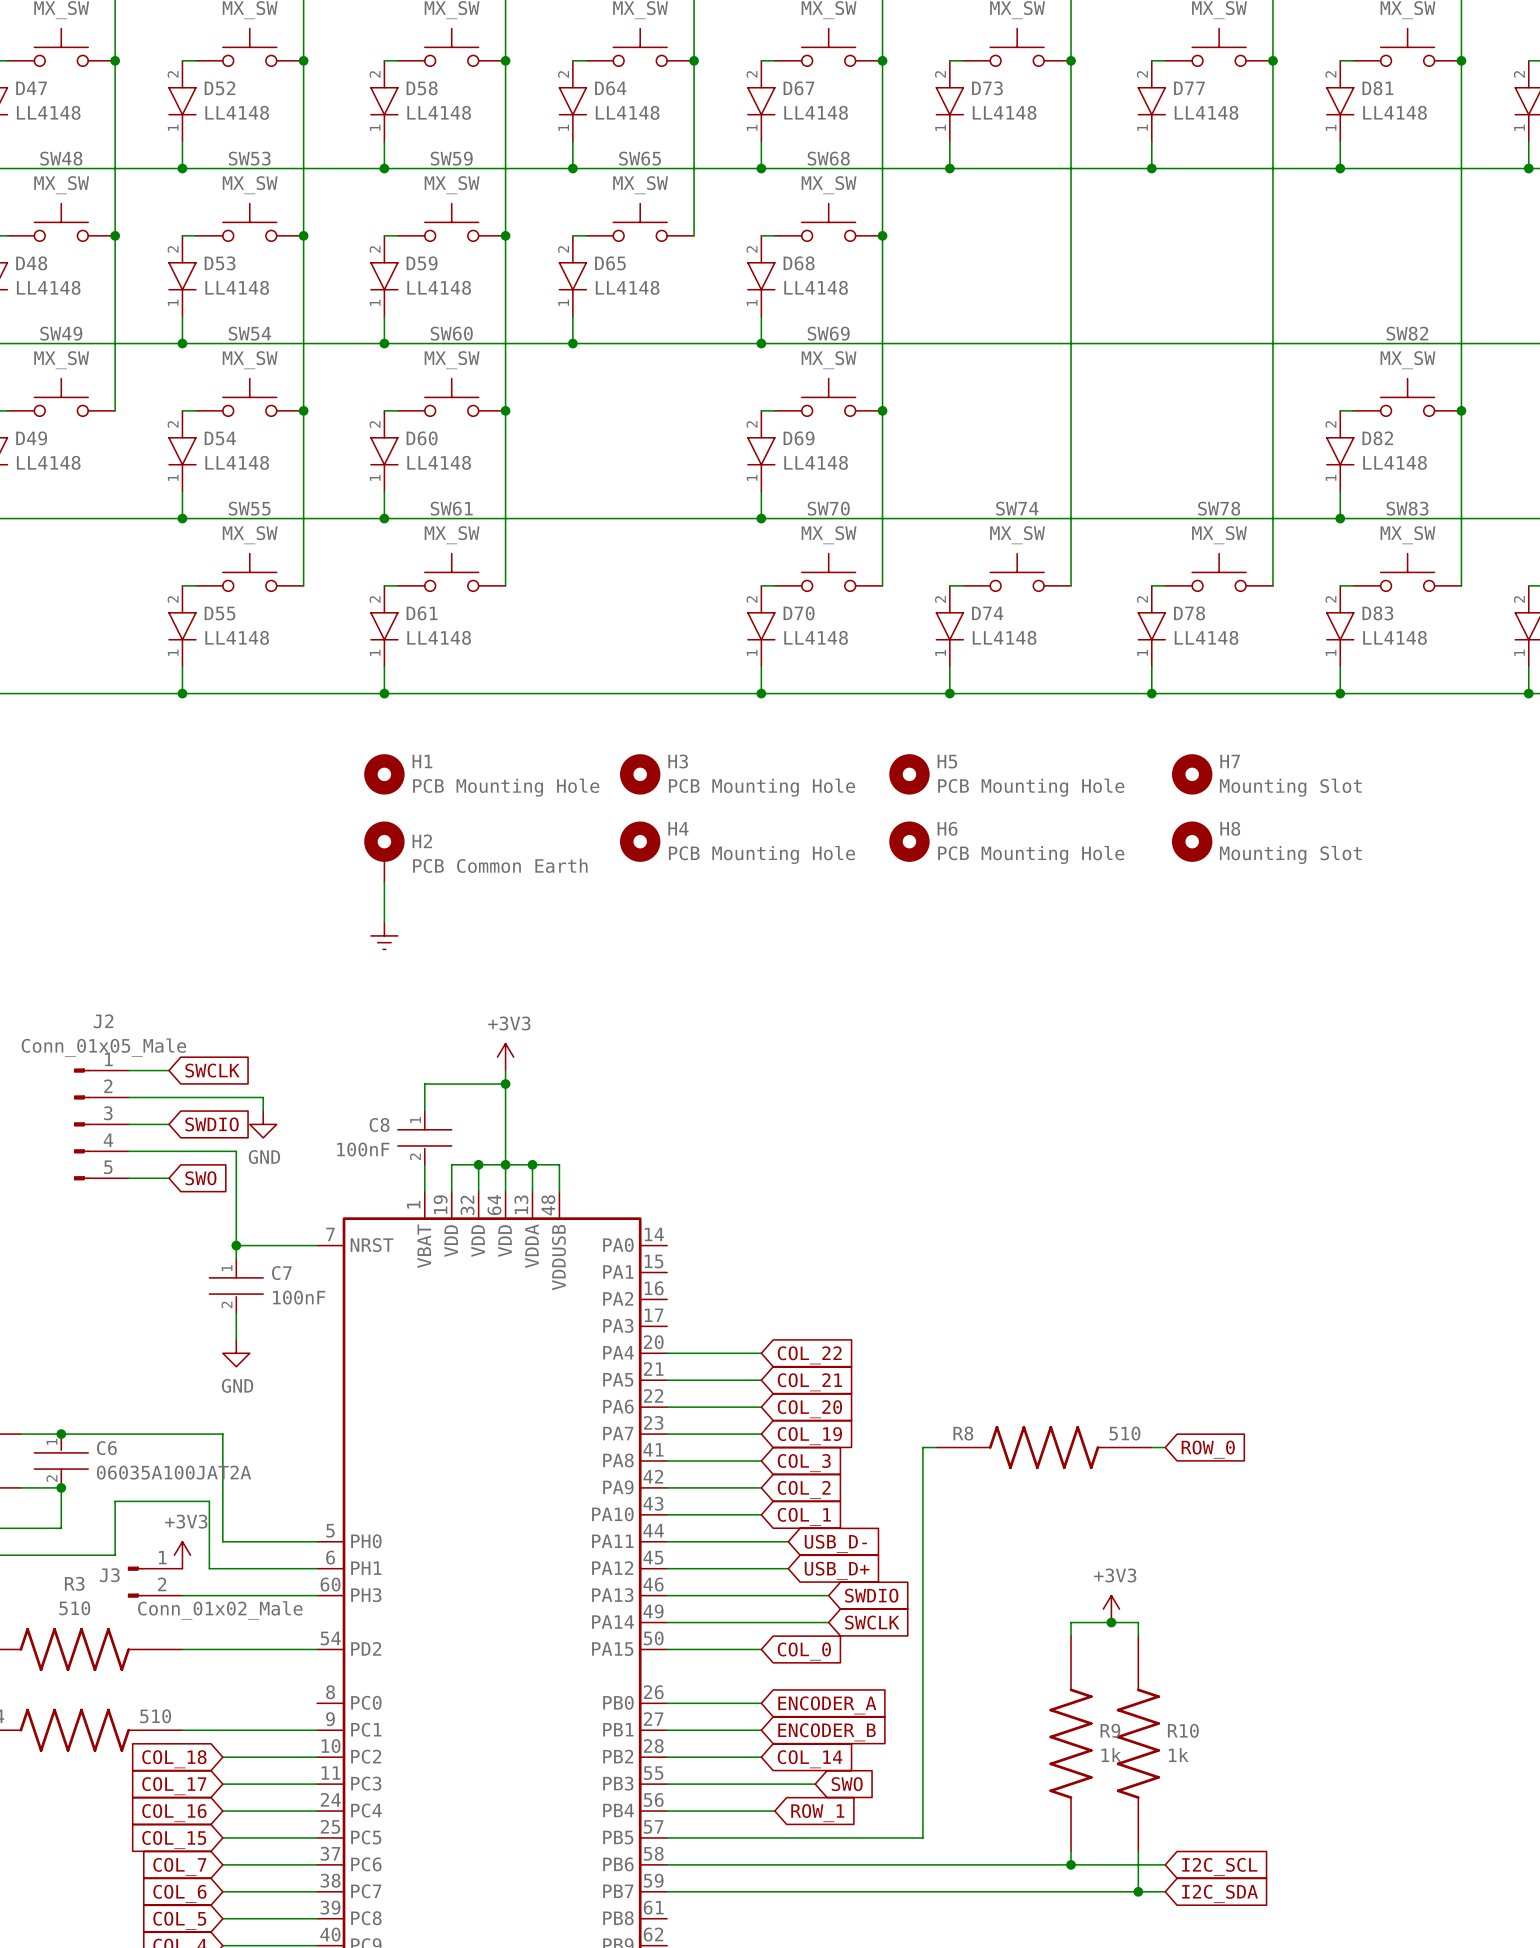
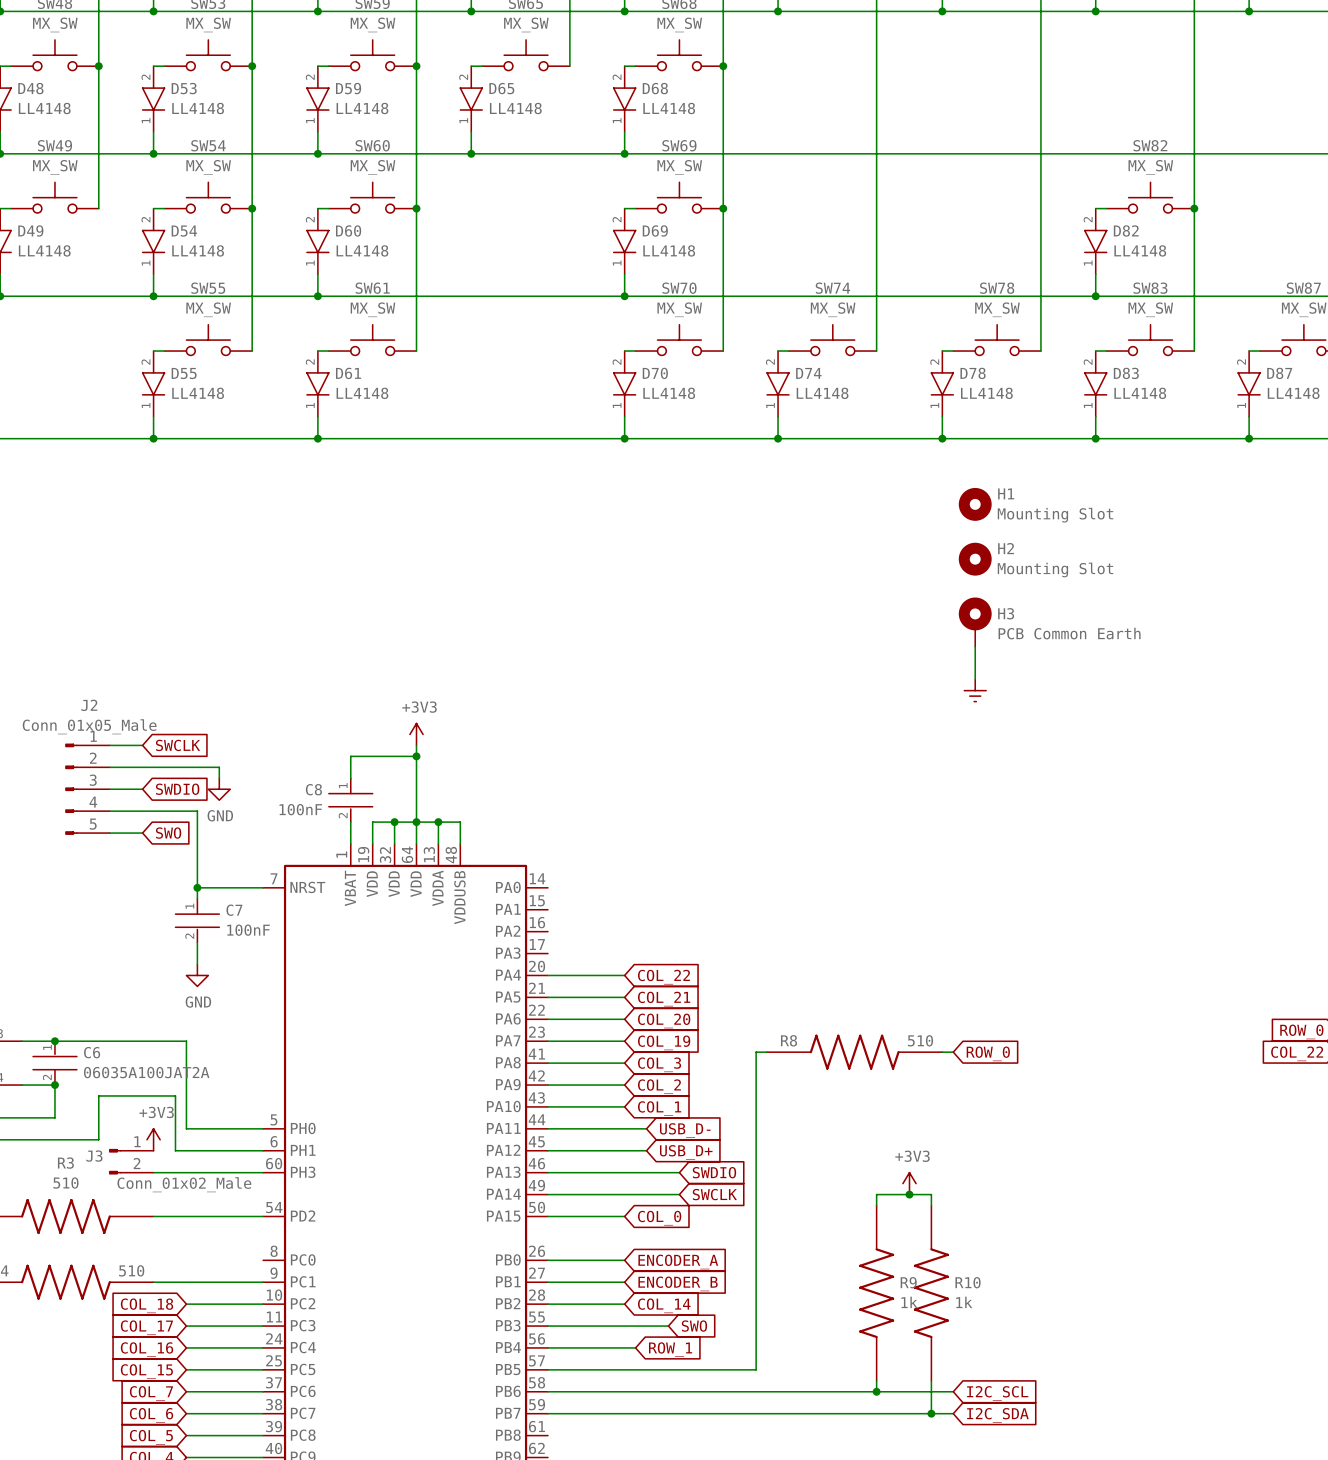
H3 symbol: [620, 754, 661, 795] -> [958, 597, 992, 647]
H7 name: H7 (1230, 761) -> H1 (1006, 493)
H1: PCB Mounting Hole (384, 774) -> none
H5: PCB Mounting Hole (909, 774) -> none
H3 value: PCB Mounting Hole (761, 787) -> PCB Common Earth (1069, 633)
H8 name: H8 (1230, 828) -> H2 (1006, 548)
H4: PCB Mounting Hole (640, 841) -> none
H6: PCB Mounting Hole (909, 841) -> none
H2: PCB Common Earth (384, 851) -> none
wire: (384, 882) (384, 922) -> none
power symbol: (384, 935) -> none
wire: none -> (975, 646) (975, 679)
power symbol: none -> (975, 690)

